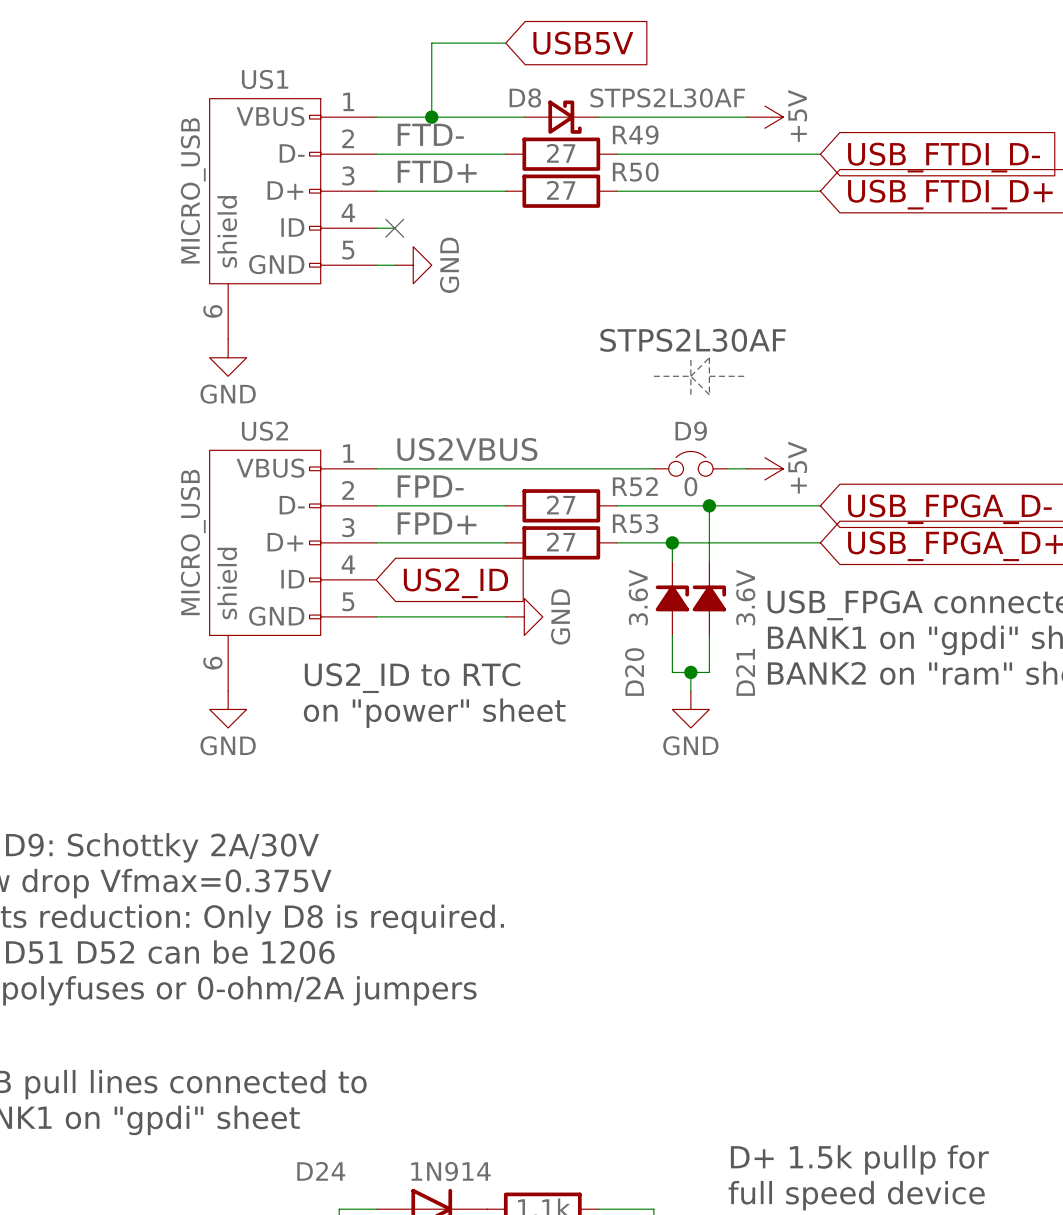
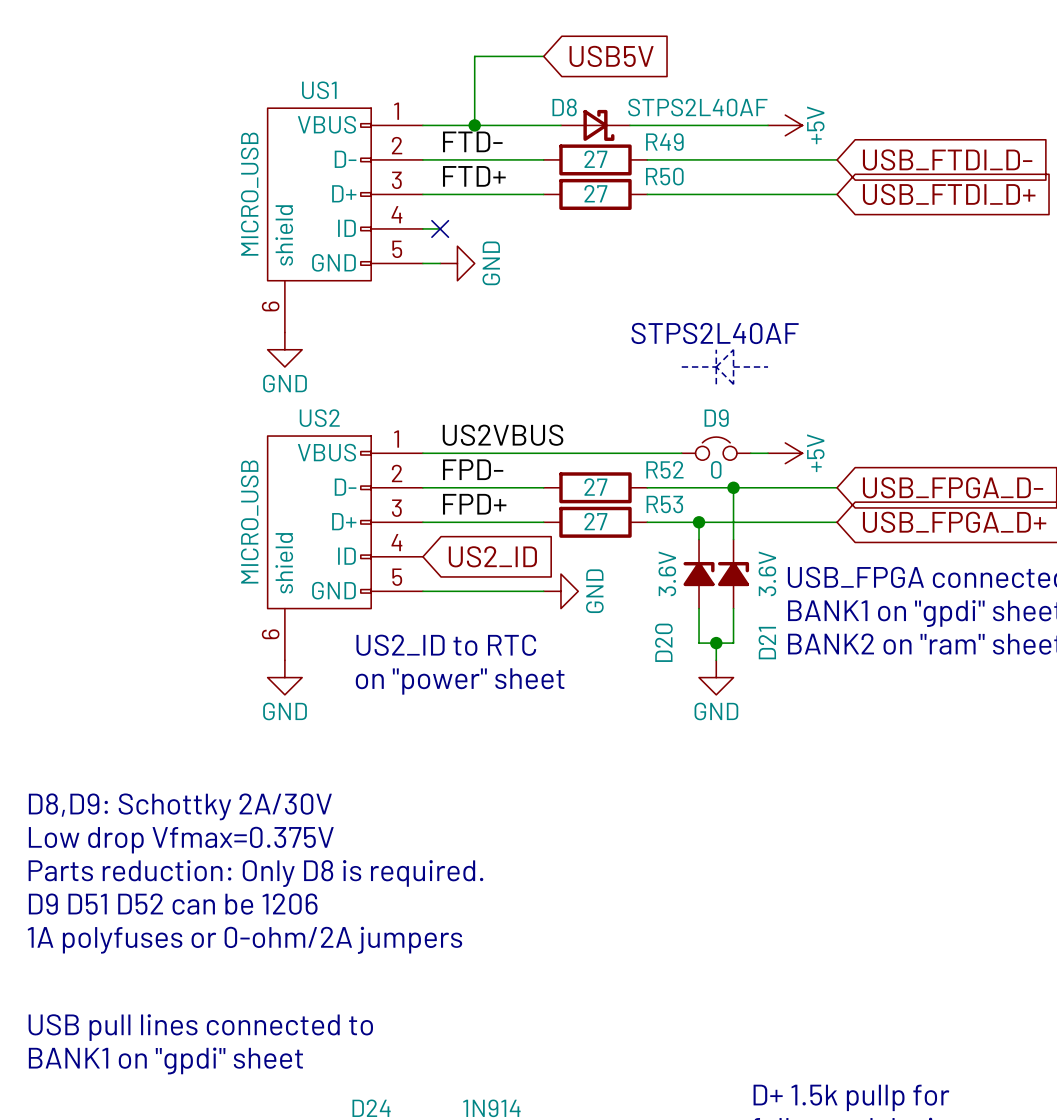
D8 value: STPS2L30AF (667, 97) -> STPS2L40AF (697, 107)
text: STPS2L30AF (693, 340) -> STPS2L40AF (715, 333)

